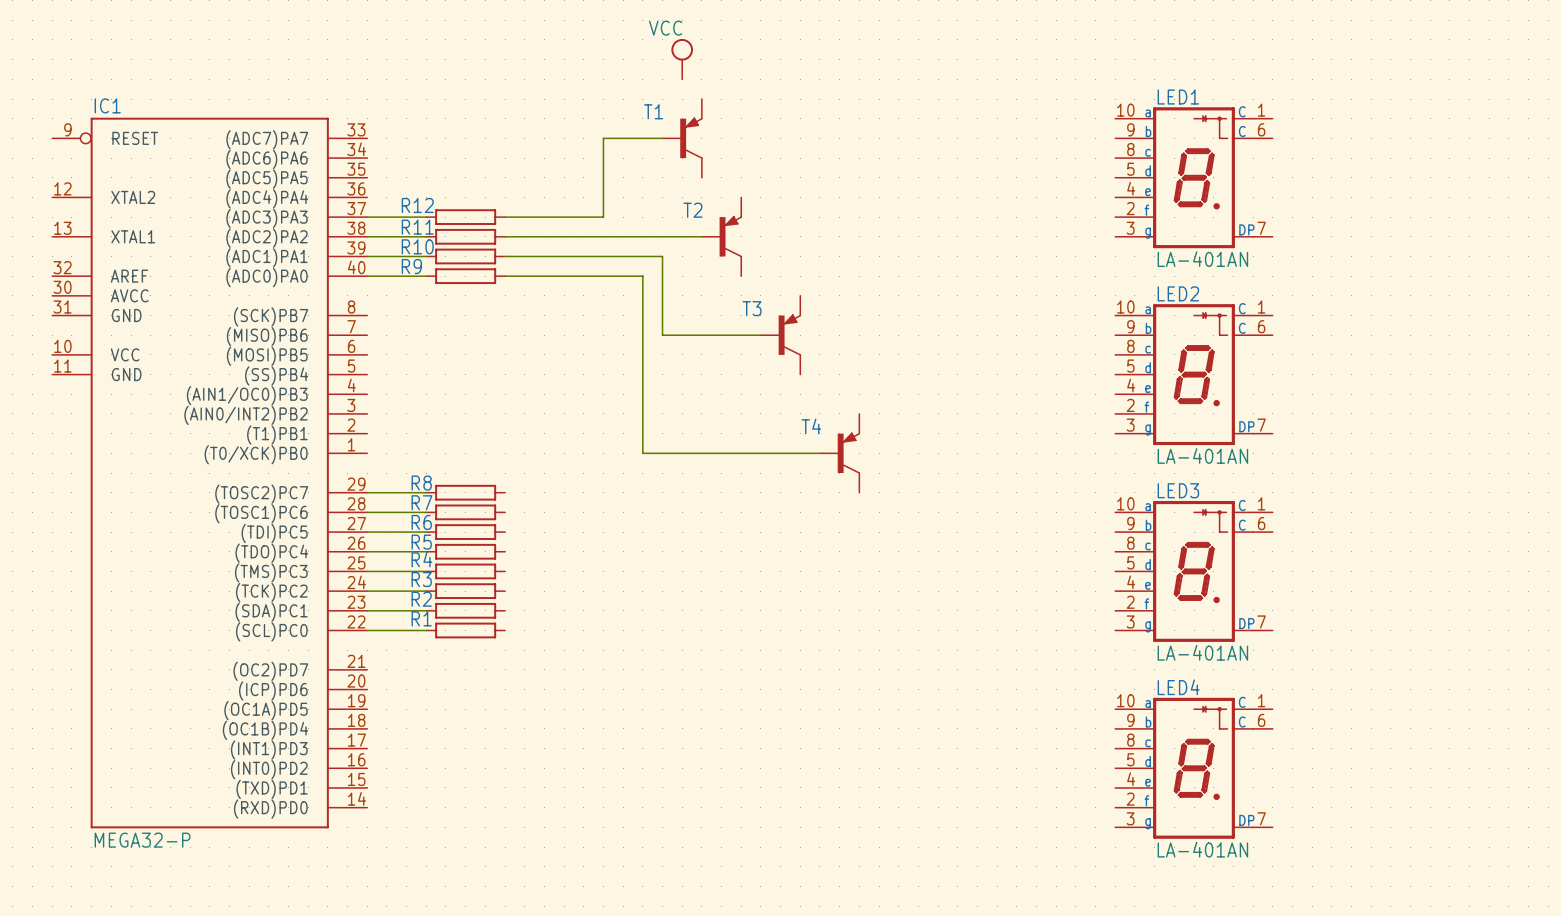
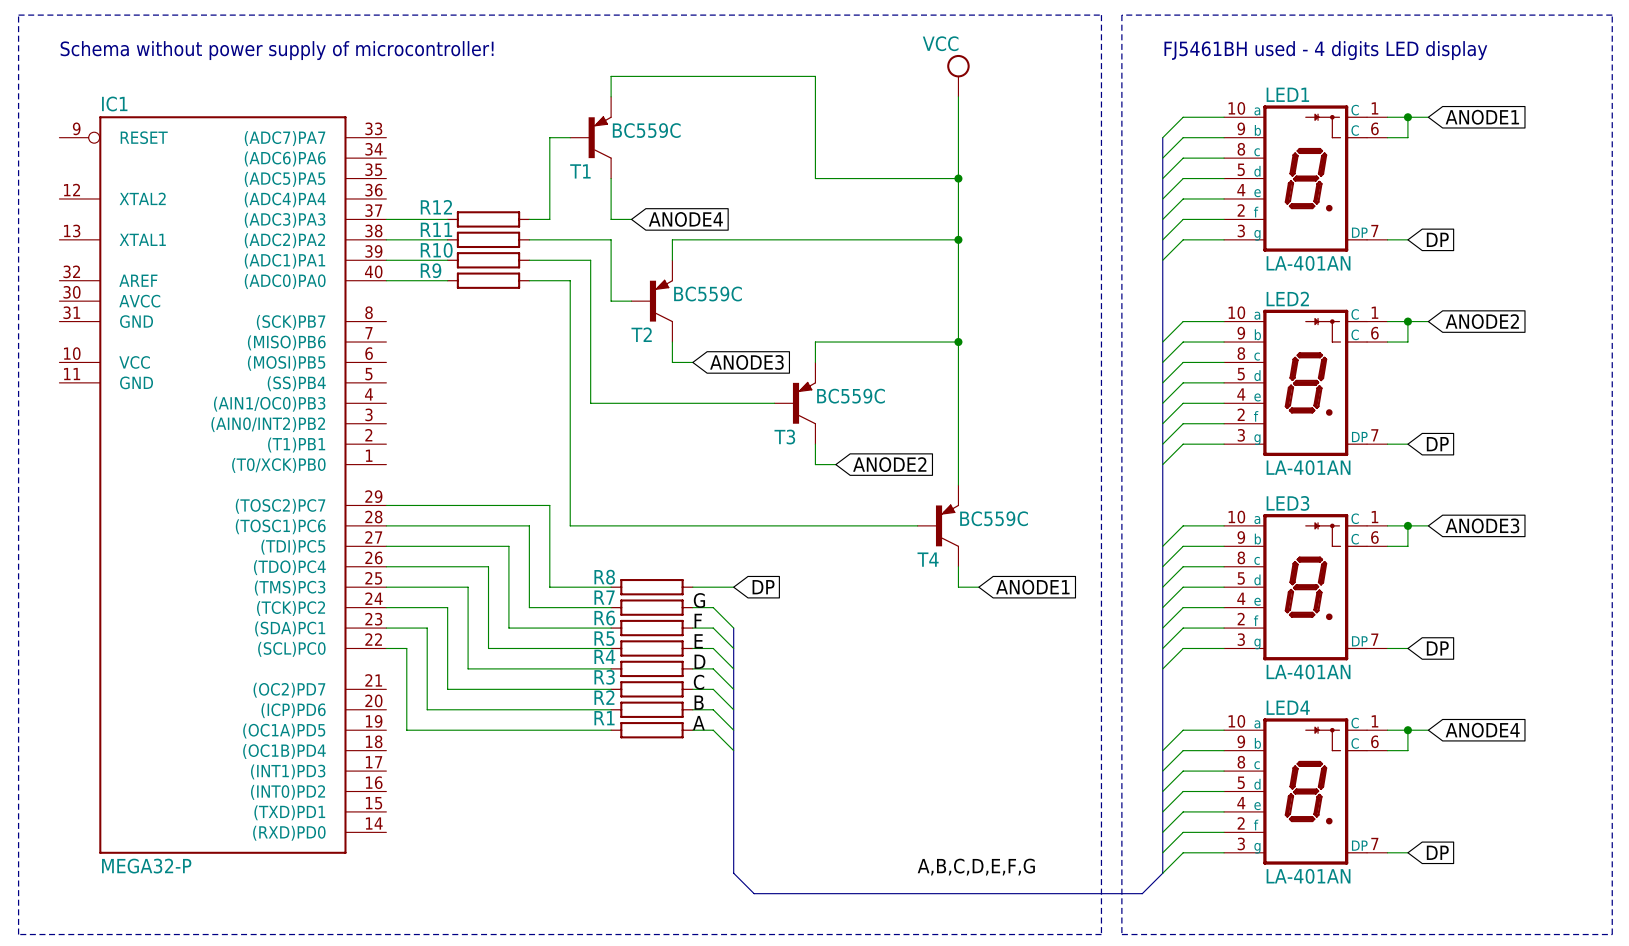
line: none -> (18, 15) (1101, 15) (1101, 934) (18, 934) (18, 15)
line: none -> (1121, 15) (1121, 934) (1612, 934) (1612, 15) (1121, 15)
text: none -> FJ5461BH used - 4 digits LED display (1325, 50)
text: none -> Schema without power supply of microcontroller! (277, 50)
power symbol: VCC (682, 59) -> none
power symbol: none -> VCC (958, 75)
wire: none -> (611, 96) (611, 76) (815, 76) (815, 178) (958, 178)
wire: none -> (958, 96) (958, 485)
T1 name position: T1 (653, 111) -> T1 (580, 171)
wire: none -> (1224, 117) (1183, 117) (1162, 137)
wire: none -> (1387, 117) (1428, 117)
wire: none -> (1407, 117) (1407, 137) (1387, 137)
junction: none -> (1407, 117)
global label: none -> ANODE1 (1482, 117)
T1 value: none -> BC559C (646, 130)
wire: none -> (570, 137) (549, 137) (549, 219)
wire: (662, 138) (603, 138) (603, 217) -> none
T1 position: (682, 138) -> (590, 137)
bus: none -> (1162, 137) (1162, 873) (1142, 893) (754, 893) (733, 873) (733, 628)
wire: none -> (1224, 137) (1183, 137) (1162, 158)
wire: none -> (1224, 158) (1183, 158) (1162, 178)
junction: none -> (958, 178)
wire: none -> (1224, 178) (1183, 178) (1162, 198)
LED1 position: (1194, 177) -> (1305, 178)
wire: none -> (1224, 198) (1183, 198) (1162, 219)
T2 name position: T2 (692, 210) -> T2 (641, 334)
global label: none -> ANODE4 (685, 219)
wire: (524, 217) (583, 217) -> (611, 178) (611, 219)
wire: none -> (1224, 219) (1183, 219) (1162, 239)
wire: (583, 236) (642, 236) -> (672, 260) (672, 239)
wire: none -> (611, 239) (611, 301) (631, 301)
wire: none -> (733, 239) (958, 239)
T2 position: (721, 236) -> (652, 301)
junction: none -> (958, 239)
wire: none -> (1224, 239) (1183, 239) (1162, 260)
wire: none -> (1387, 239) (1407, 239)
global label: none -> DP (1437, 239)
wire: (564, 256) (662, 256) (662, 335) (760, 335) -> (590, 260) (590, 403) (774, 403)
wire: (544, 276) (642, 276) (642, 335) -> (570, 280) (570, 525) (917, 525)
T2 value: none -> BC559C (708, 294)
T3 name position: T3 (752, 308) -> T3 (784, 437)
wire: none -> (1224, 321) (1183, 321) (1162, 342)
wire: none -> (1387, 321) (1428, 321)
wire: none -> (1407, 321) (1407, 342) (1387, 342)
junction: none -> (1407, 321)
global label: none -> ANODE2 (1482, 321)
T3 position: (780, 335) -> (795, 403)
wire: none -> (958, 342) (815, 342) (815, 362)
junction: none -> (958, 342)
wire: none -> (1224, 342) (1183, 342) (1162, 362)
wire: (642, 354) (642, 453) (780, 453) -> (672, 362) (692, 362)
global label: none -> ANODE3 (746, 362)
wire: none -> (1224, 362) (1183, 362) (1162, 382)
wire: none -> (1224, 382) (1183, 382) (1162, 403)
LED2 position: (1194, 374) -> (1305, 382)
T3 value: none -> BC559C (851, 396)
wire: none -> (1224, 403) (1183, 403) (1162, 423)
wire: none -> (1224, 423) (1183, 423) (1162, 444)
T4 name position: T4 (811, 426) -> T4 (928, 559)
wire: none -> (815, 444) (815, 464)
wire: none -> (1224, 444) (1183, 444) (1162, 464)
wire: none -> (1387, 444) (1407, 444)
global label: none -> DP (1437, 444)
wire: (800, 453) (819, 453) -> none
T4 position: (839, 453) -> (938, 525)
global label: none -> ANODE2 (889, 464)
wire: none -> (447, 505) (549, 505) (549, 587) (611, 587)
R8 position: (465, 492) -> (651, 587)
T4 value: none -> BC559C (994, 518)
wire: none -> (447, 525) (529, 525) (529, 607) (611, 607)
R7 position: (465, 512) -> (651, 607)
wire: none -> (1224, 525) (1183, 525) (1162, 546)
wire: none -> (1387, 525) (1428, 525)
wire: none -> (1407, 525) (1407, 546) (1387, 546)
junction: none -> (1407, 525)
global label: none -> ANODE3 (1482, 525)
wire: none -> (447, 546) (508, 546) (508, 628) (611, 628)
R6 position: (465, 532) -> (651, 628)
wire: none -> (1224, 546) (1183, 546) (1162, 566)
wire: none -> (447, 566) (488, 566) (488, 648) (611, 648)
R5 position: (465, 551) -> (651, 648)
wire: none -> (958, 566) (958, 587) (978, 587)
wire: none -> (1224, 566) (1183, 566) (1162, 587)
wire: none -> (447, 587) (468, 587) (468, 668) (611, 668)
R4 position: (465, 571) -> (651, 668)
wire: none -> (692, 587) (733, 587)
global label: none -> DP (763, 587)
global label: none -> ANODE1 (1032, 587)
wire: none -> (1224, 587) (1183, 587) (1162, 607)
LED3 position: (1194, 571) -> (1305, 587)
label: none -> G (699, 600)
wire: none -> (447, 607) (447, 689) (611, 689)
R3 position: (465, 591) -> (651, 689)
wire: none -> (692, 607) (713, 607) (733, 628)
wire: none -> (1224, 607) (1183, 607) (1162, 628)
label: none -> F (698, 620)
wire: (406, 610) (426, 610) -> (427, 628) (427, 709) (611, 709)
R2 position: (465, 610) -> (651, 709)
wire: none -> (692, 628) (713, 628) (733, 648)
wire: none -> (1224, 628) (1183, 628) (1162, 648)
label: none -> E (698, 641)
wire: (386, 630) (426, 630) -> (406, 648) (406, 730) (611, 730)
R1 position: (465, 630) -> (651, 730)
wire: none -> (692, 648) (713, 648) (733, 668)
wire: none -> (1224, 648) (1183, 648) (1162, 668)
wire: none -> (1387, 648) (1407, 648)
global label: none -> DP (1437, 648)
label: none -> D (699, 661)
wire: none -> (692, 668) (713, 668) (733, 689)
label: none -> C (699, 682)
wire: none -> (692, 689) (713, 689) (733, 709)
label: none -> B (699, 702)
wire: none -> (692, 709) (713, 709) (733, 730)
label: none -> A (698, 723)
global label: none -> ANODE4 (1482, 730)
wire: none -> (692, 730) (713, 730) (733, 750)
wire: none -> (1224, 730) (1183, 730) (1162, 750)
wire: none -> (1387, 730) (1428, 730)
wire: none -> (1407, 730) (1407, 750) (1387, 750)
junction: none -> (1407, 730)
wire: none -> (1224, 750) (1183, 750) (1162, 771)
wire: none -> (1224, 771) (1183, 771) (1162, 791)
wire: none -> (1224, 791) (1183, 791) (1162, 811)
LED4 position: (1194, 768) -> (1305, 791)
wire: none -> (1224, 811) (1183, 811) (1162, 832)
wire: none -> (1224, 832) (1183, 832) (1162, 852)
wire: none -> (1224, 852) (1183, 852) (1162, 873)
wire: none -> (1387, 852) (1407, 852)
global label: none -> DP (1437, 852)
label: none -> A,B,C,D,E,F,G (976, 867)

